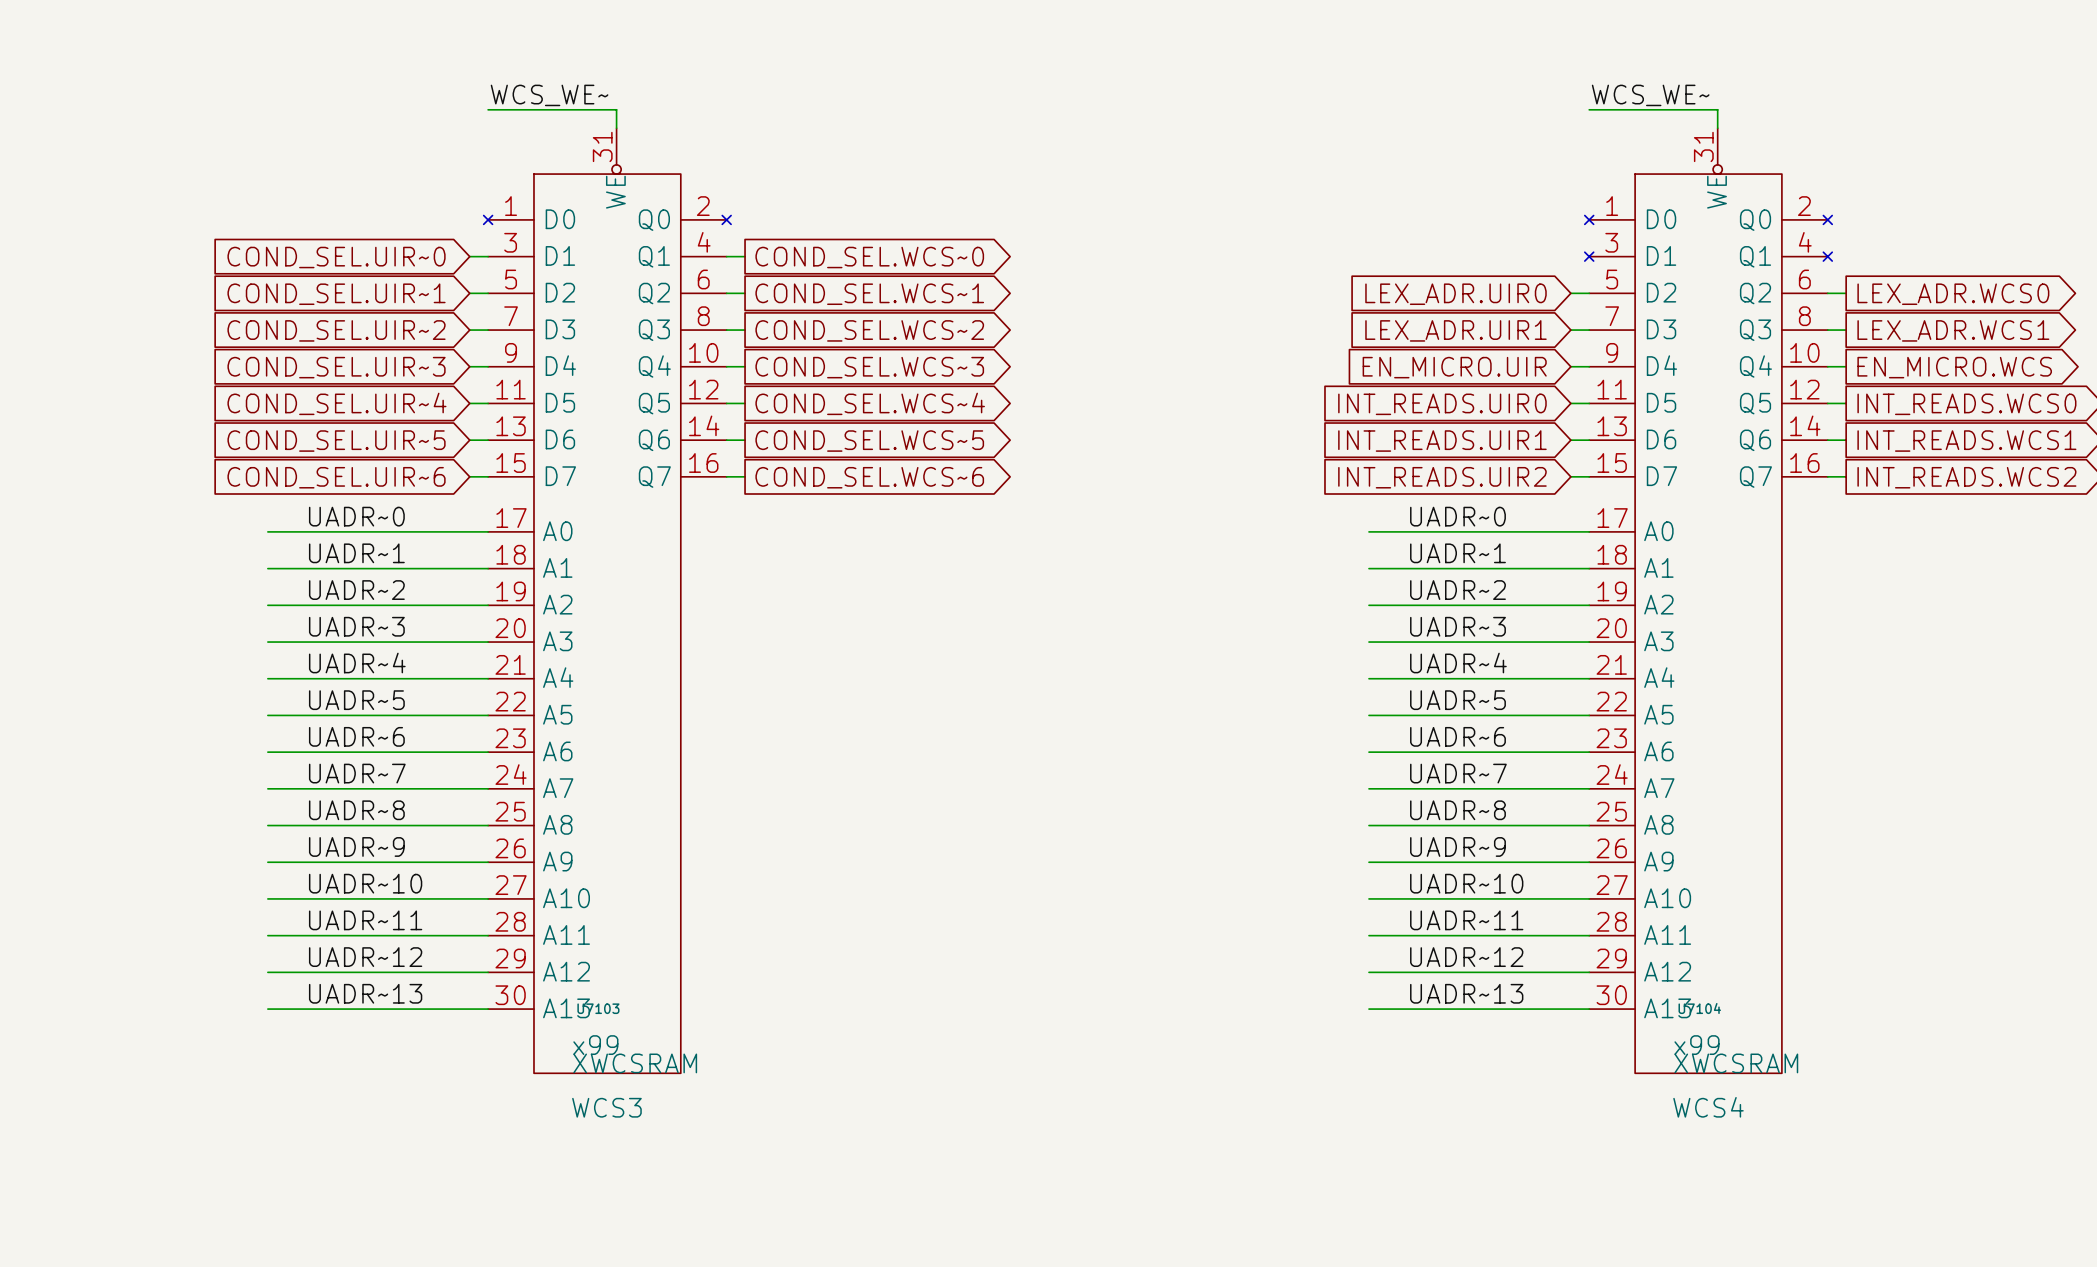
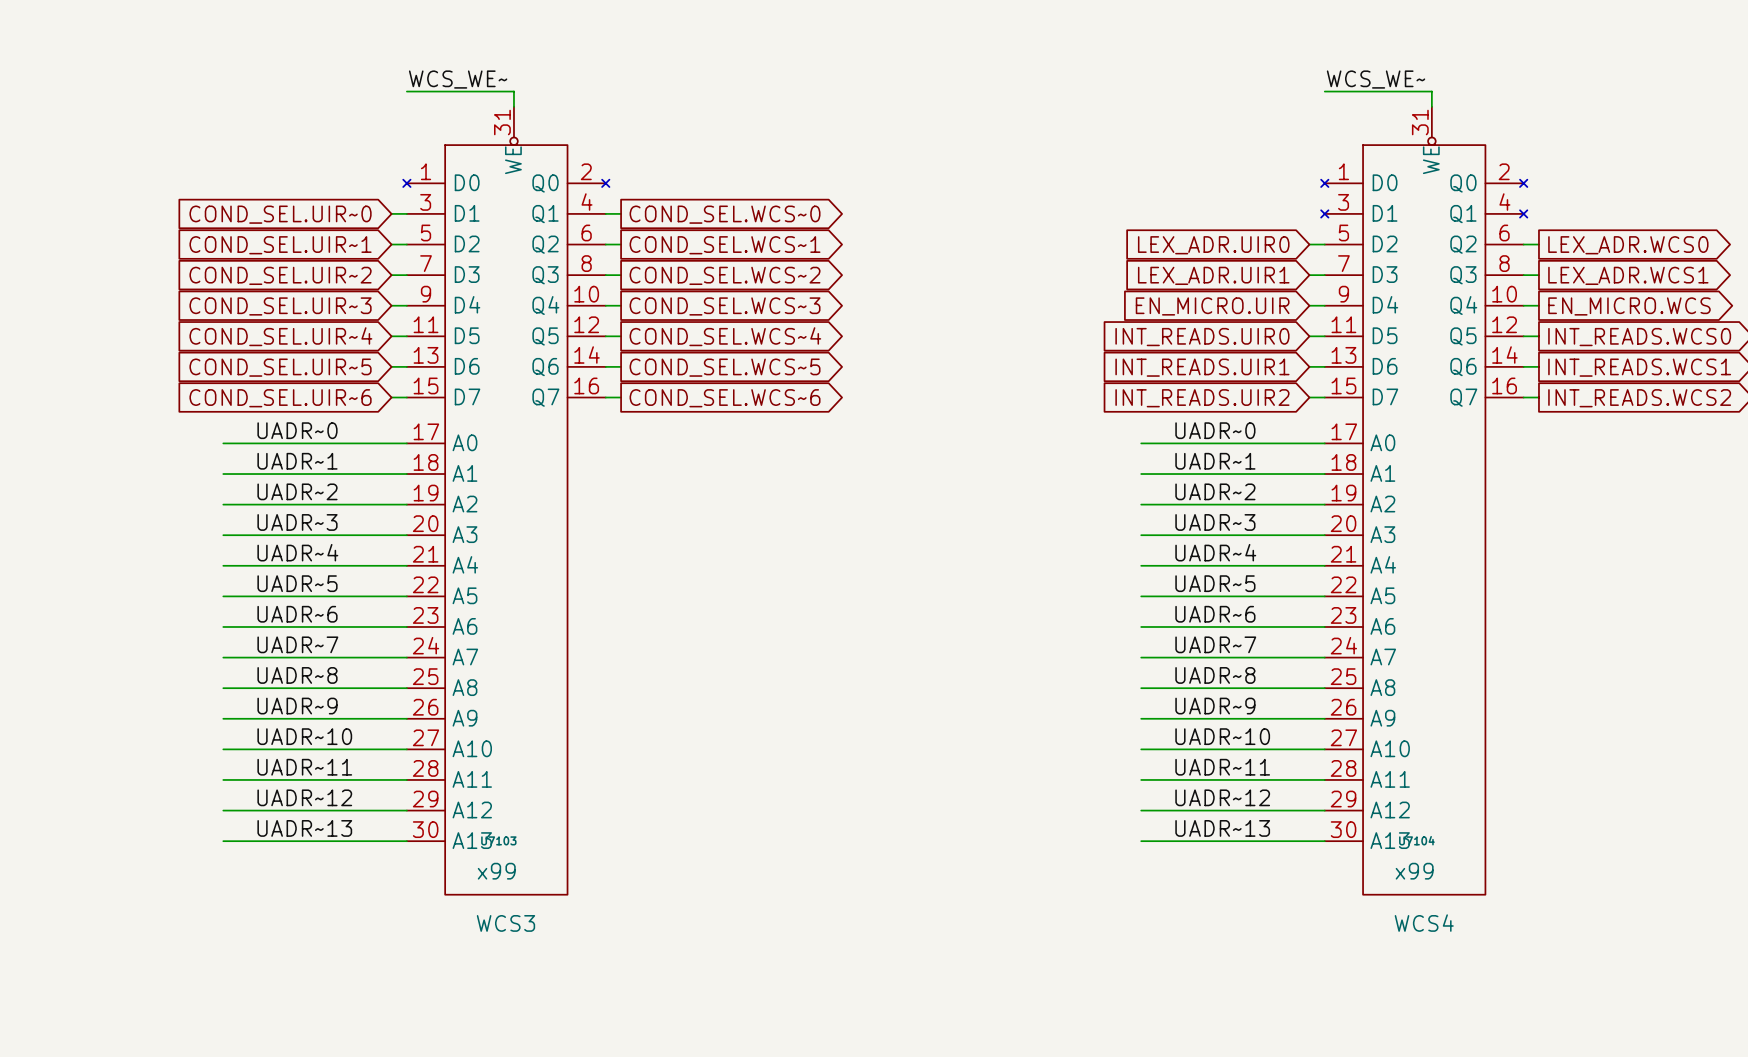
U7103 value: XWCSRAM (635, 1063) -> none
U7104 value: XWCSRAM (1736, 1063) -> none

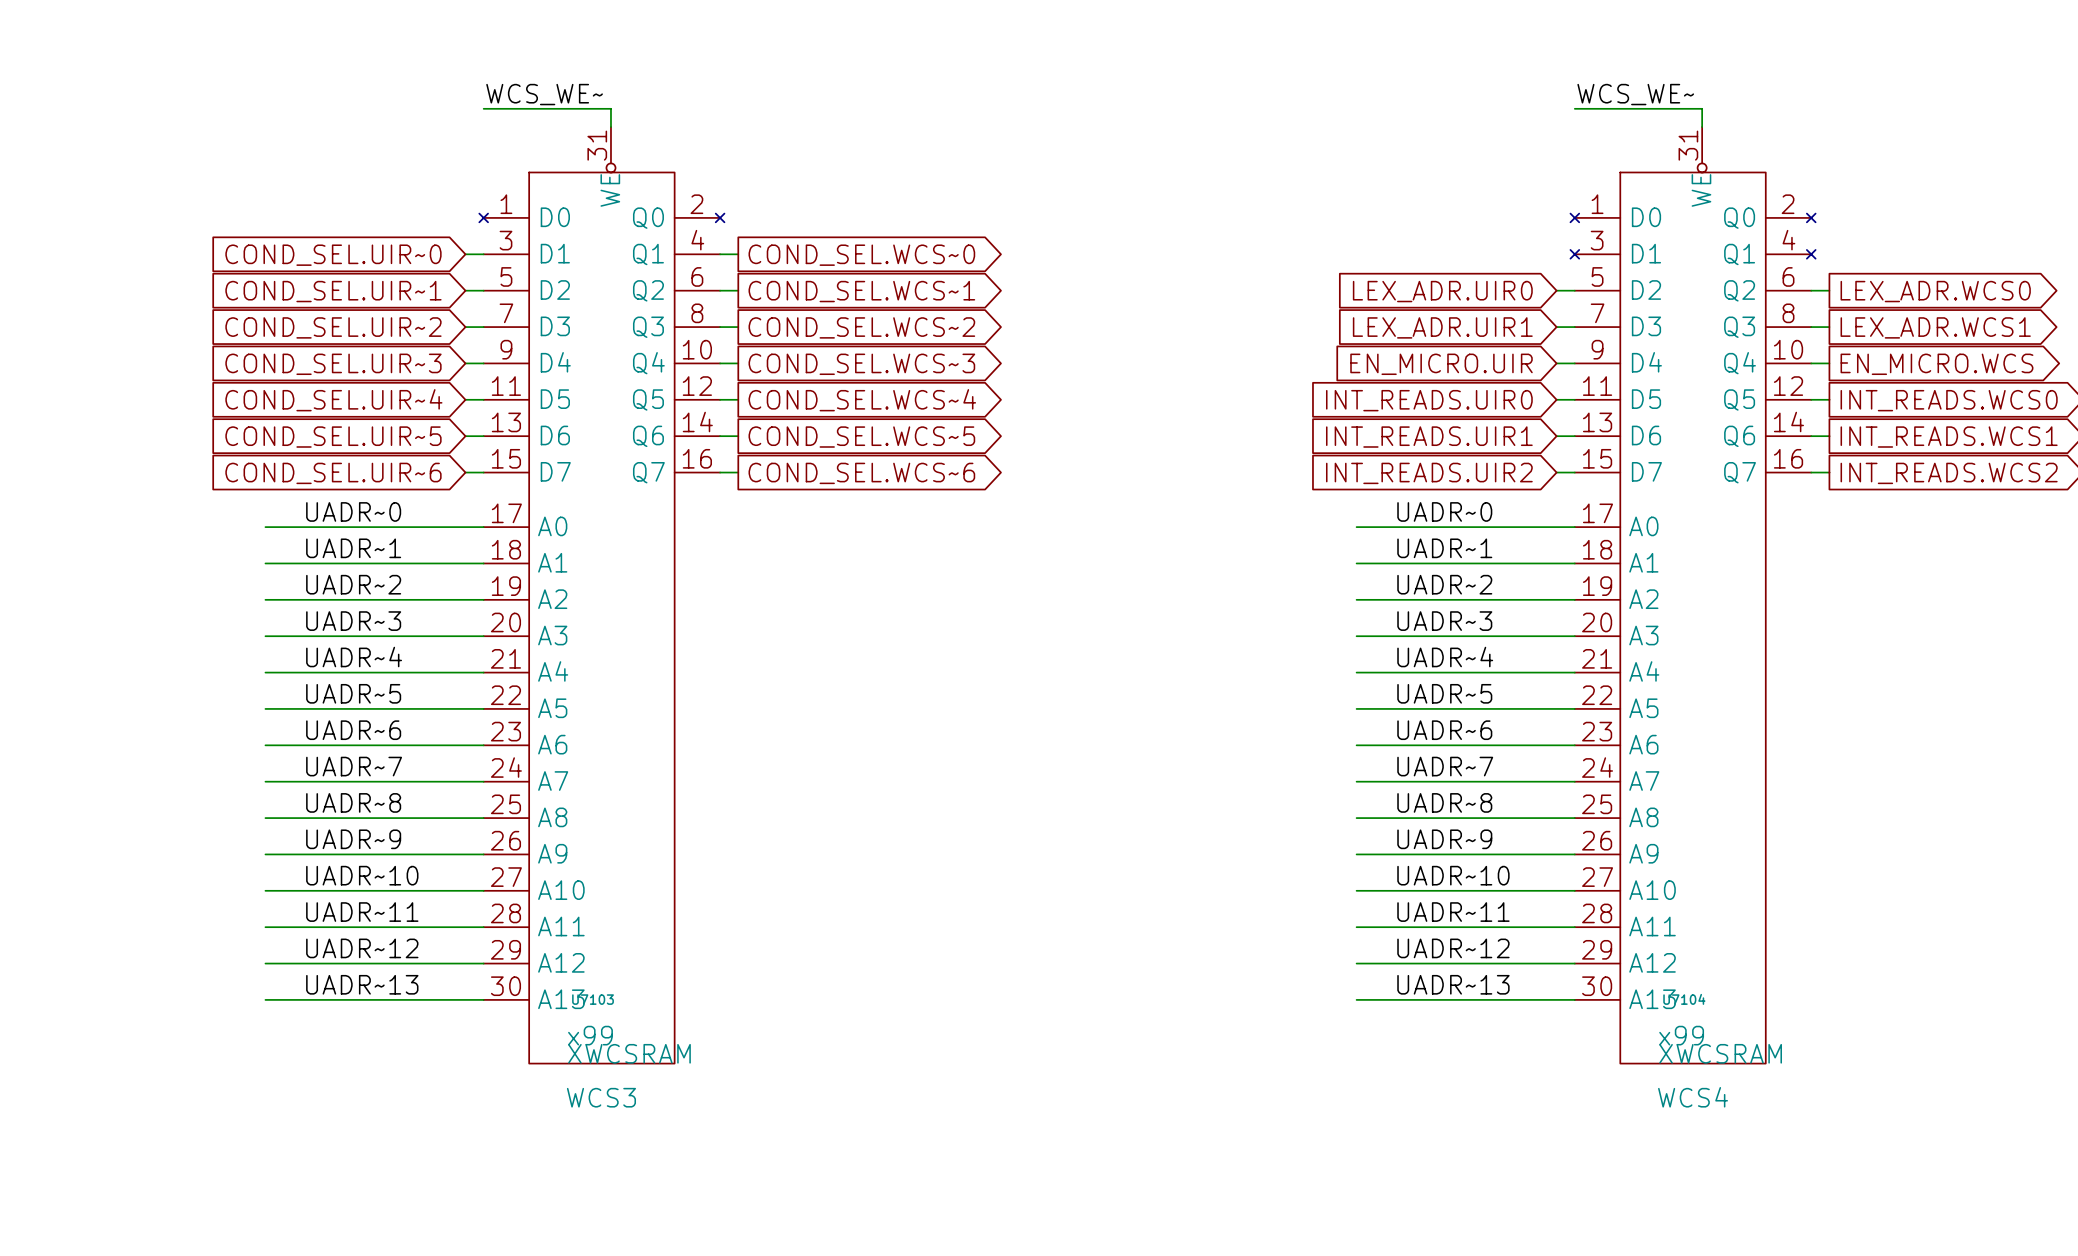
U7103 value: none -> XWCSRAM (629, 1053)
U7104 value: none -> XWCSRAM (1720, 1053)

